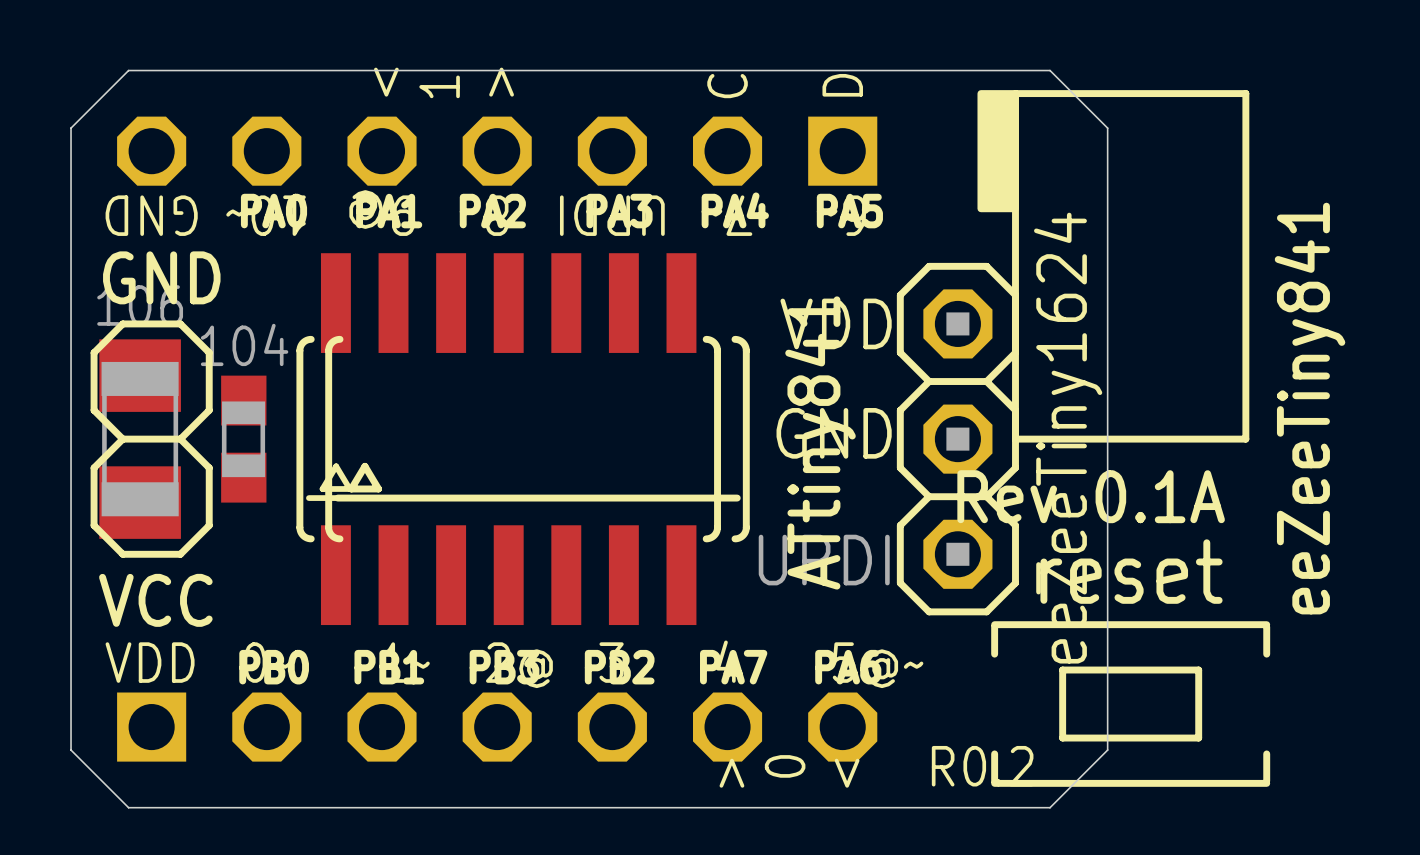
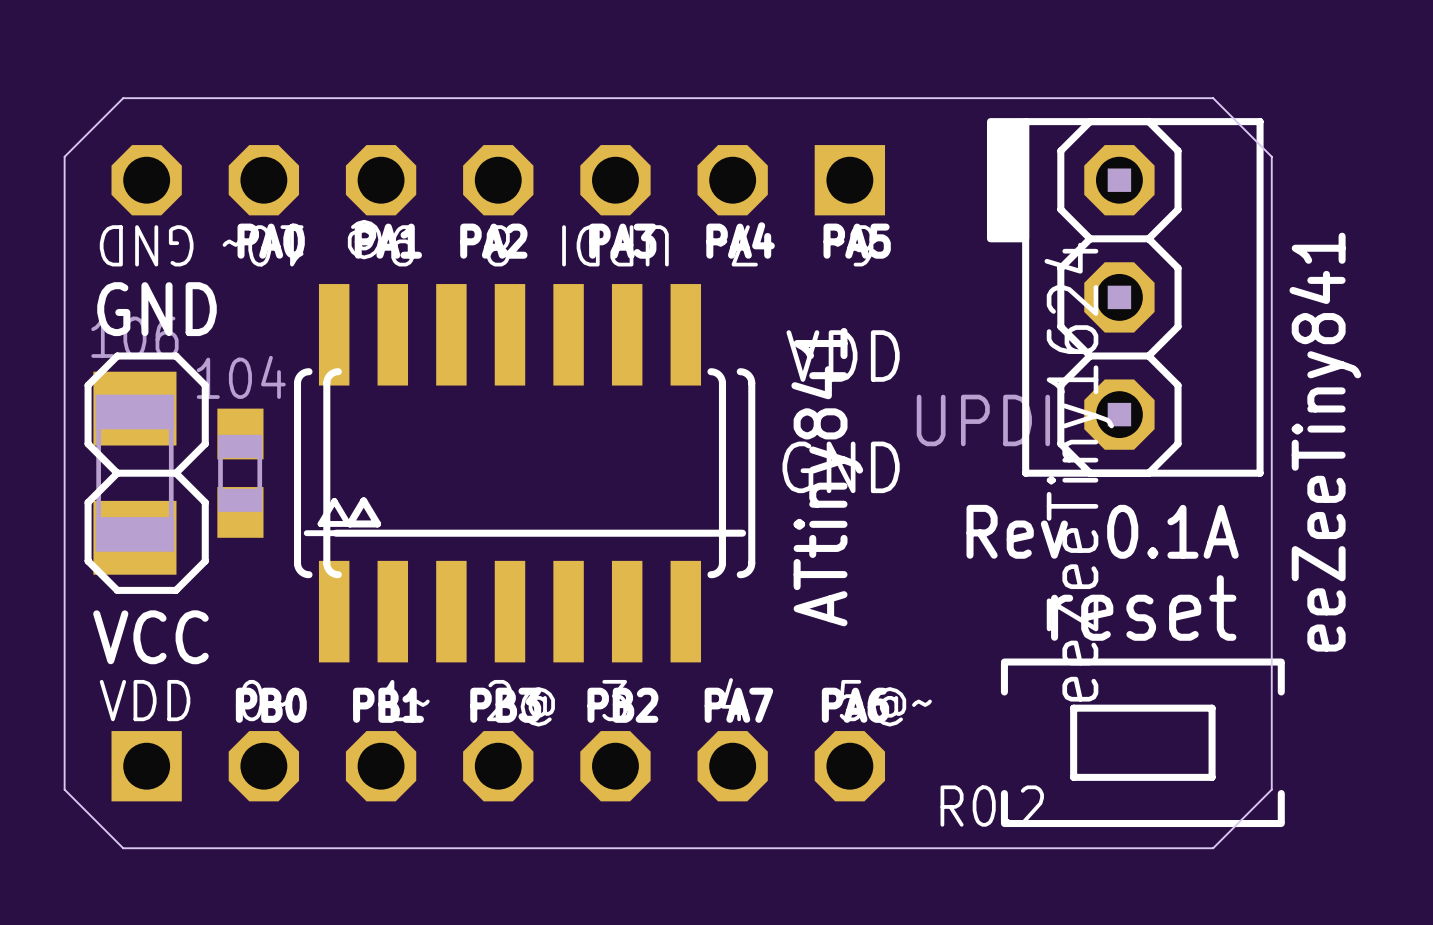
board edge: (1050, 70) (1107, 128) (1107, 750) (1050, 807) -> (1060, 98) (1213, 98) (1271, 156) (1271, 789) (1213, 848) (1060, 848)
text: < (386, 82) -> none
text: > (501, 82) -> none
text: D (842, 85) -> none
text: 1 (439, 86) -> none
text: C (727, 86) -> none
part position: (957, 439) -> (1119, 297)
text: 0 (785, 766) -> none
text: > (731, 773) -> none
text: < (847, 773) -> none

